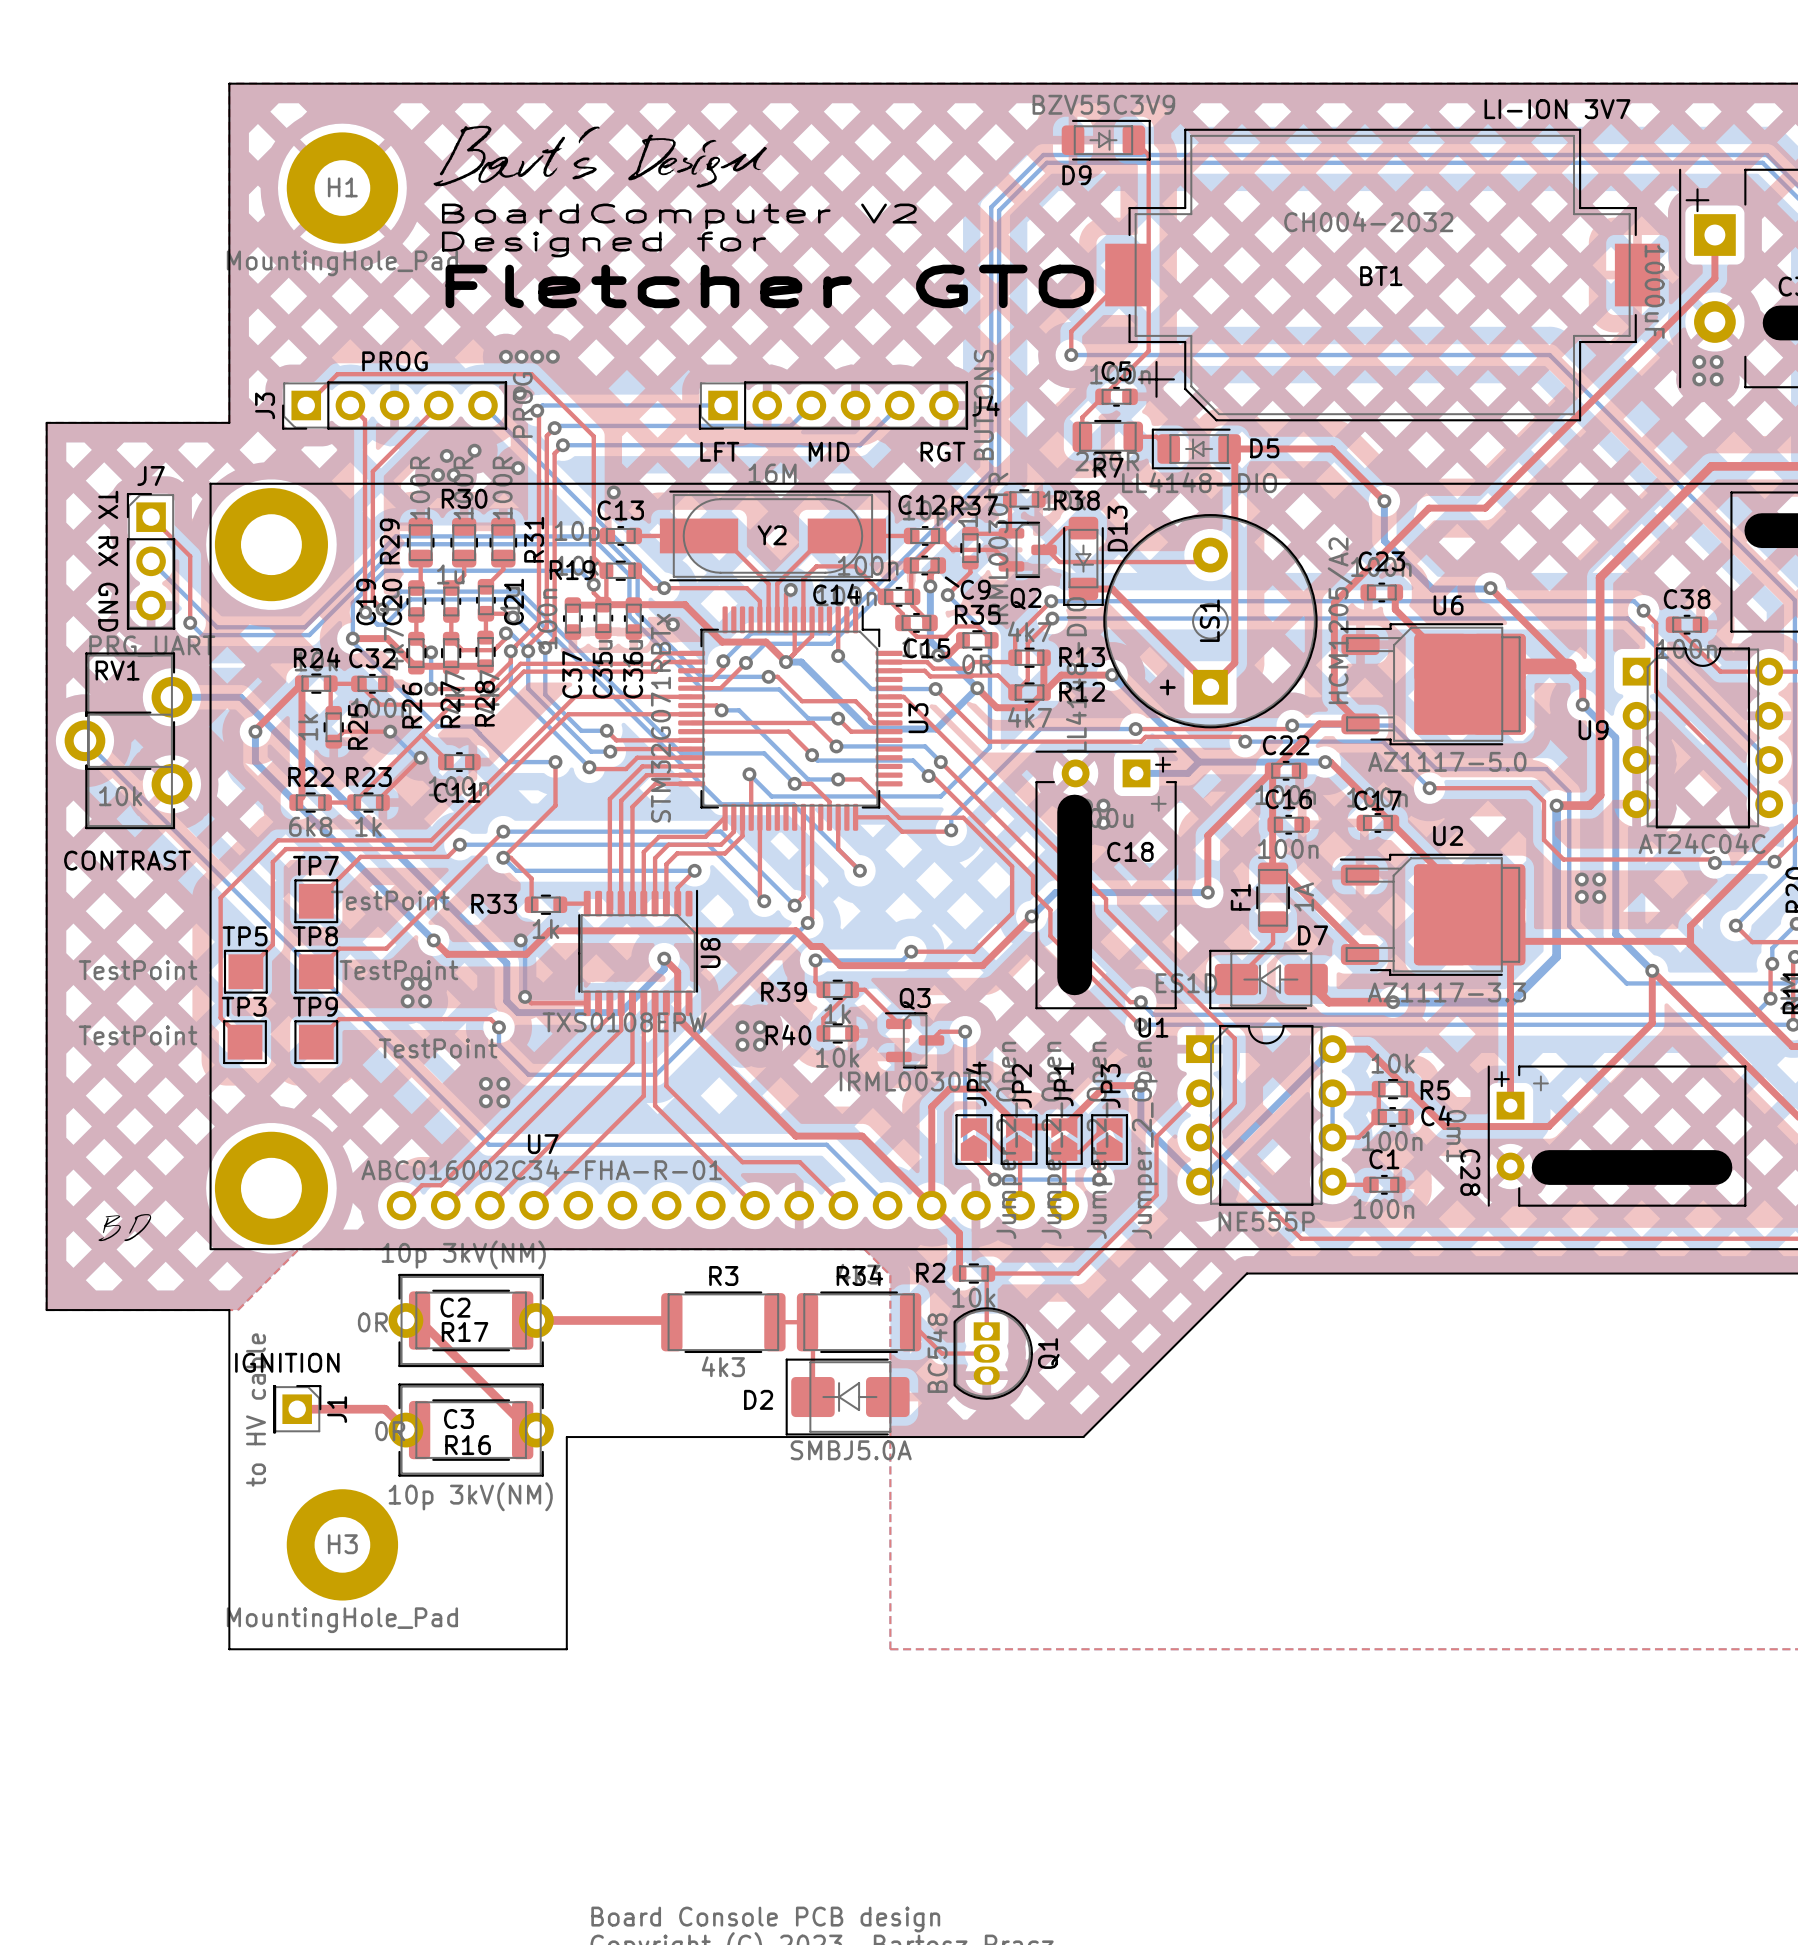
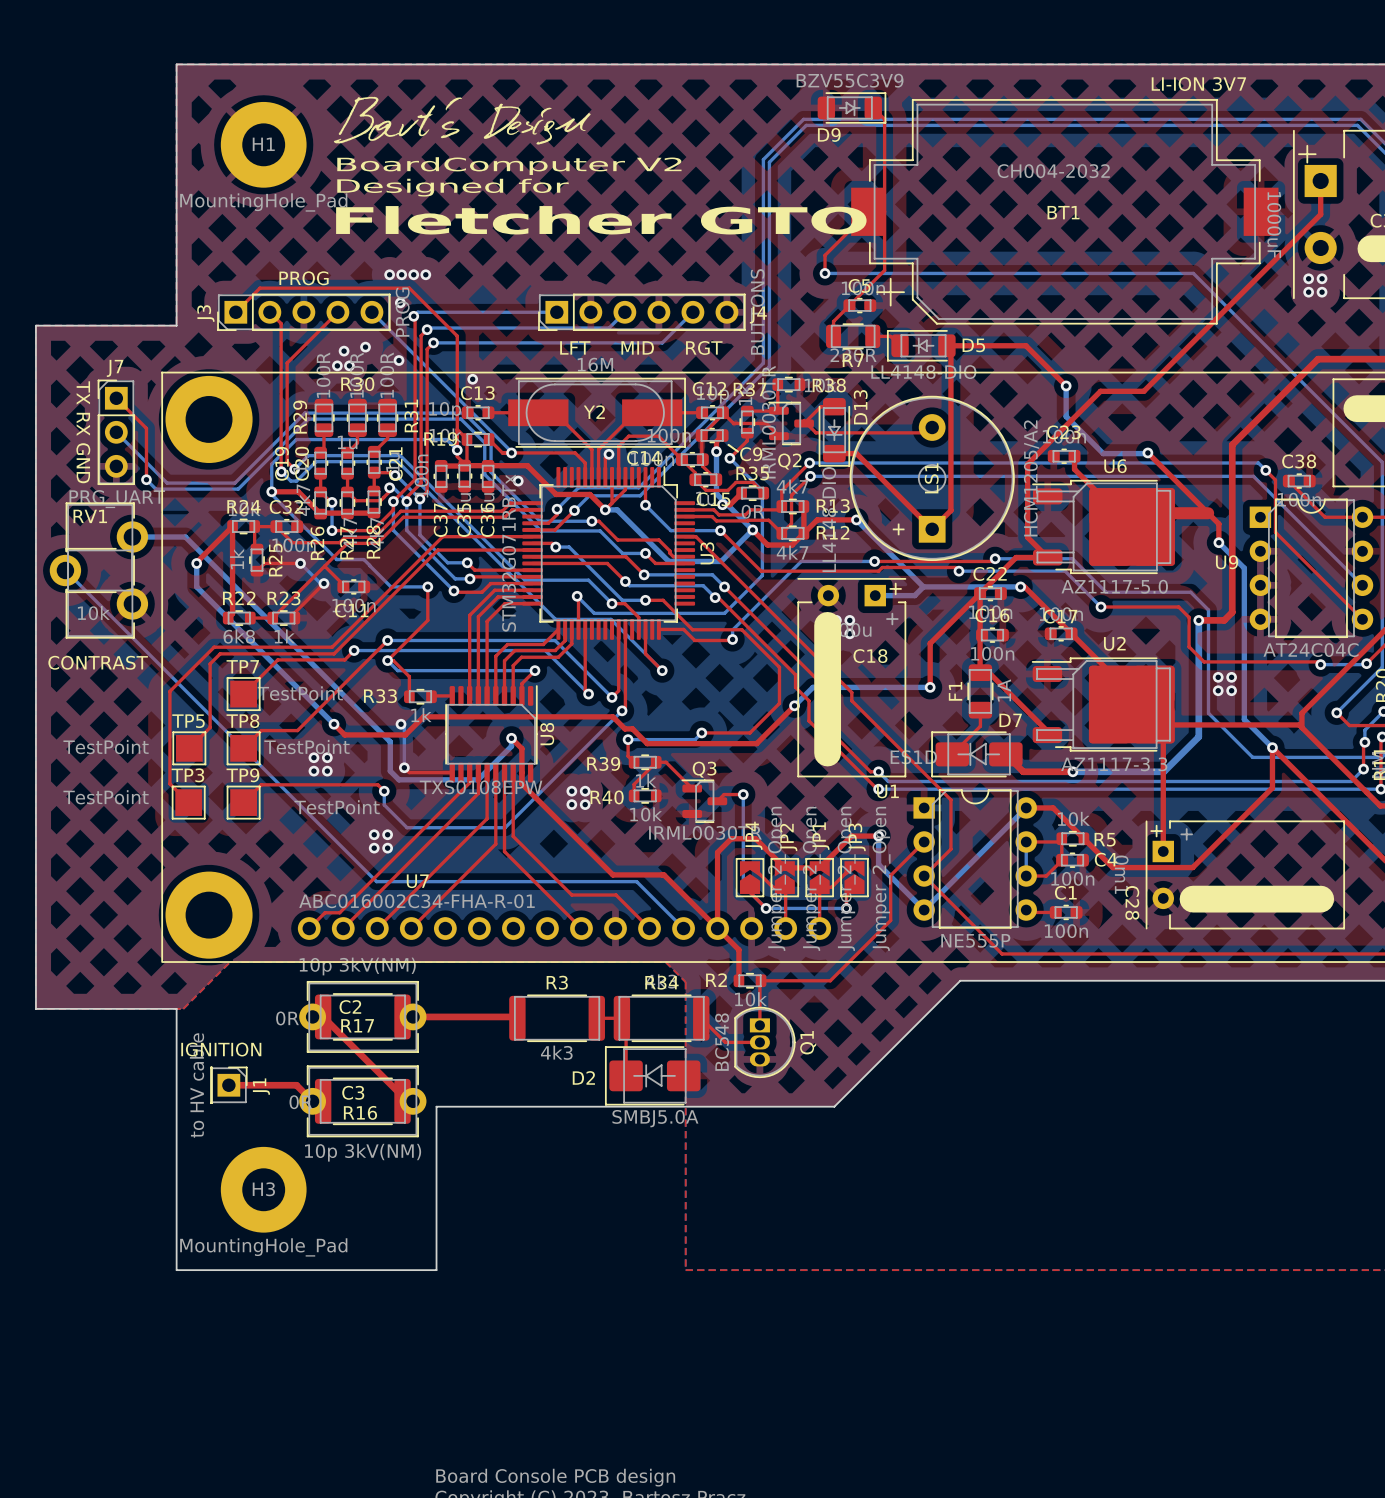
drawing: [98, 1214, 152, 1242] -> none

